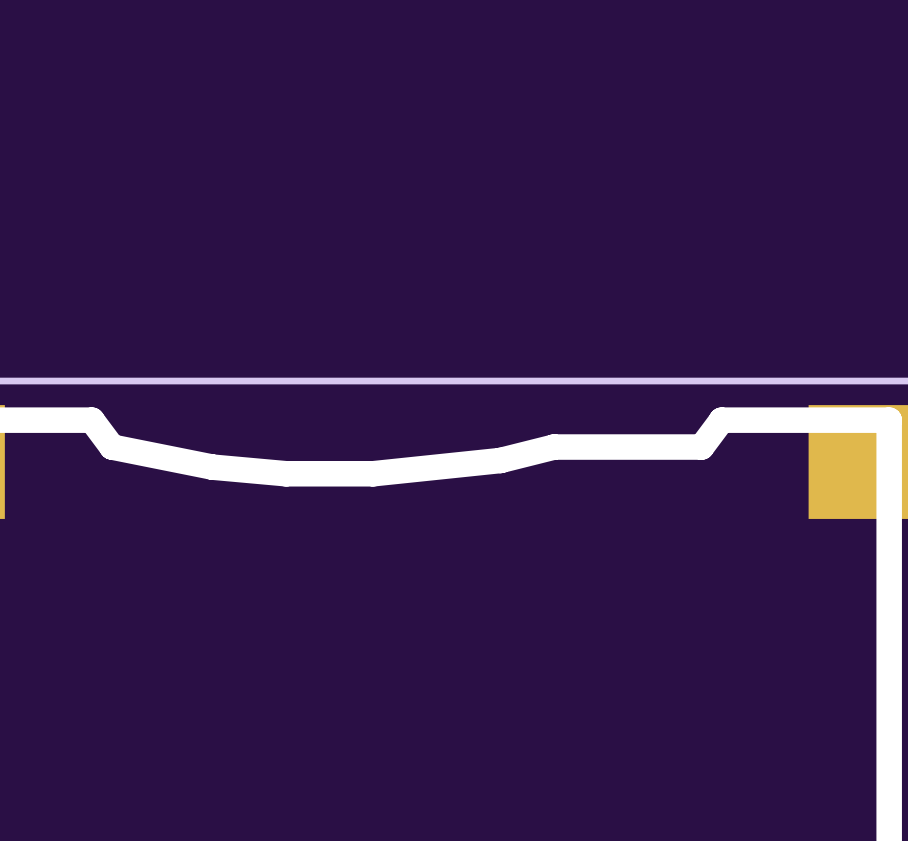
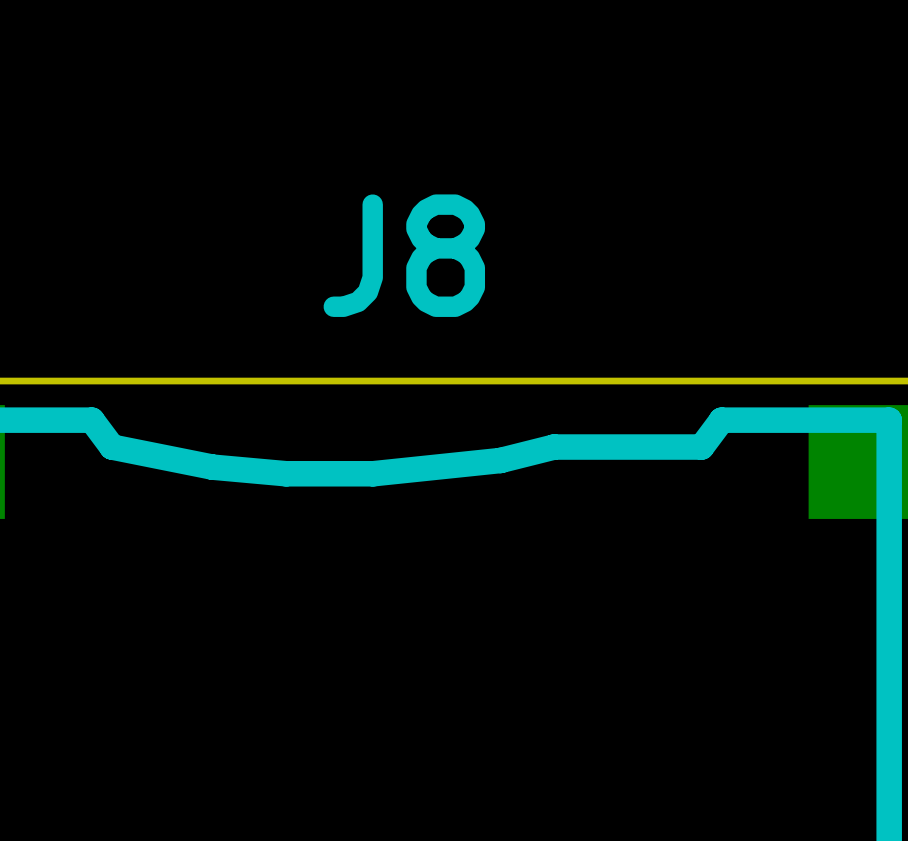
J8 name: none -> J8 (404, 255)

